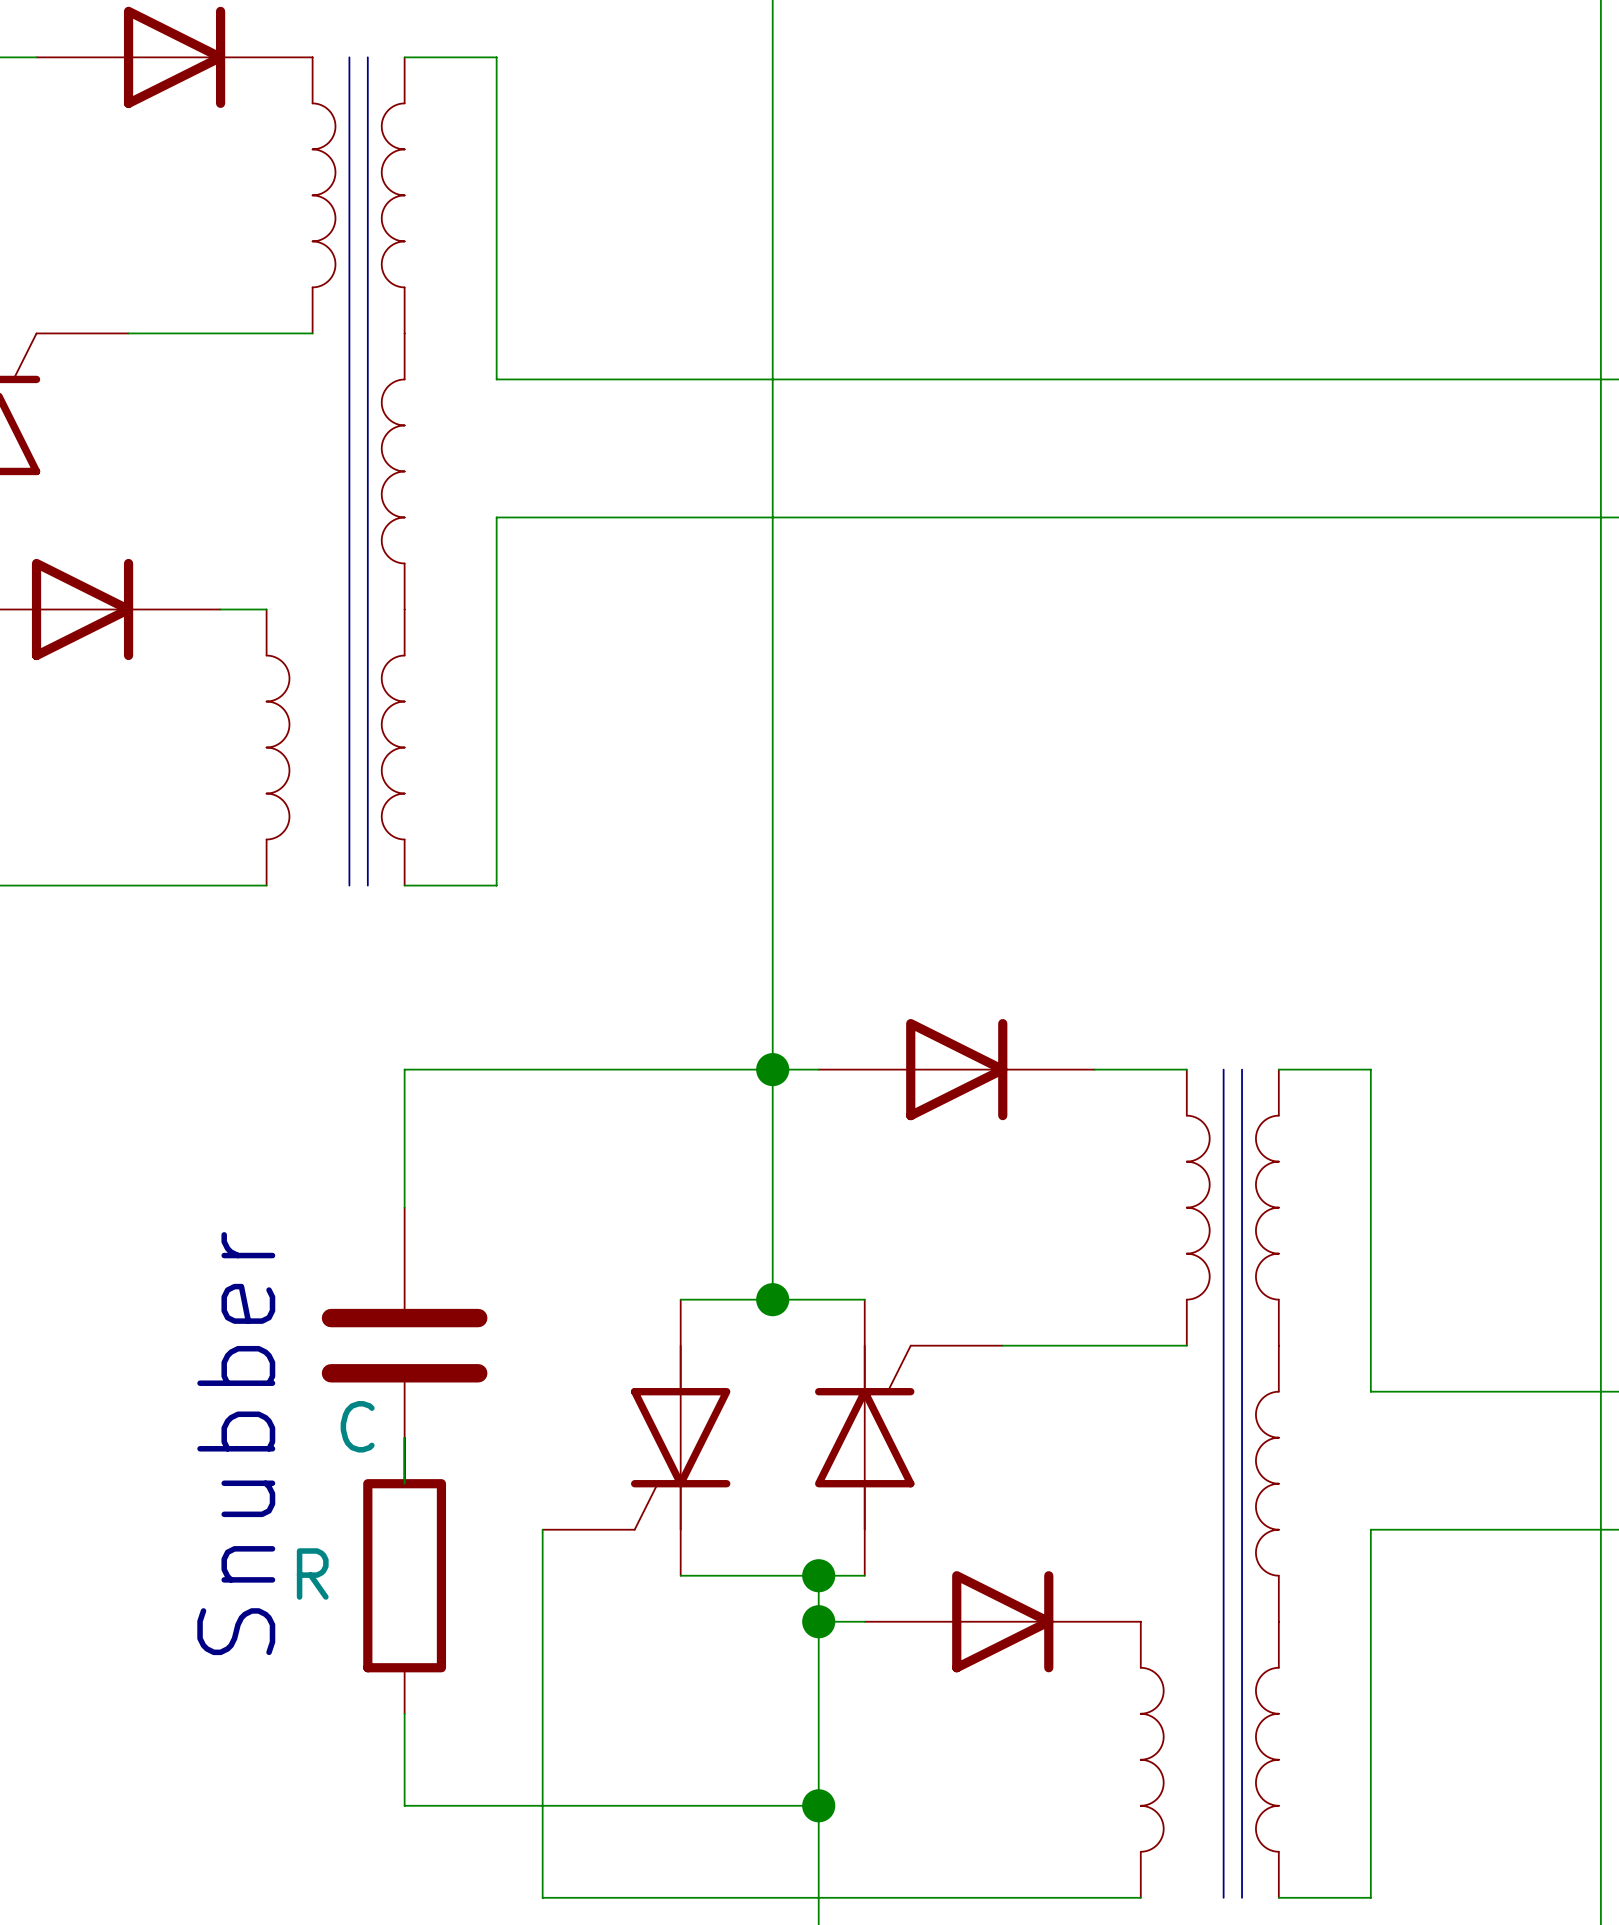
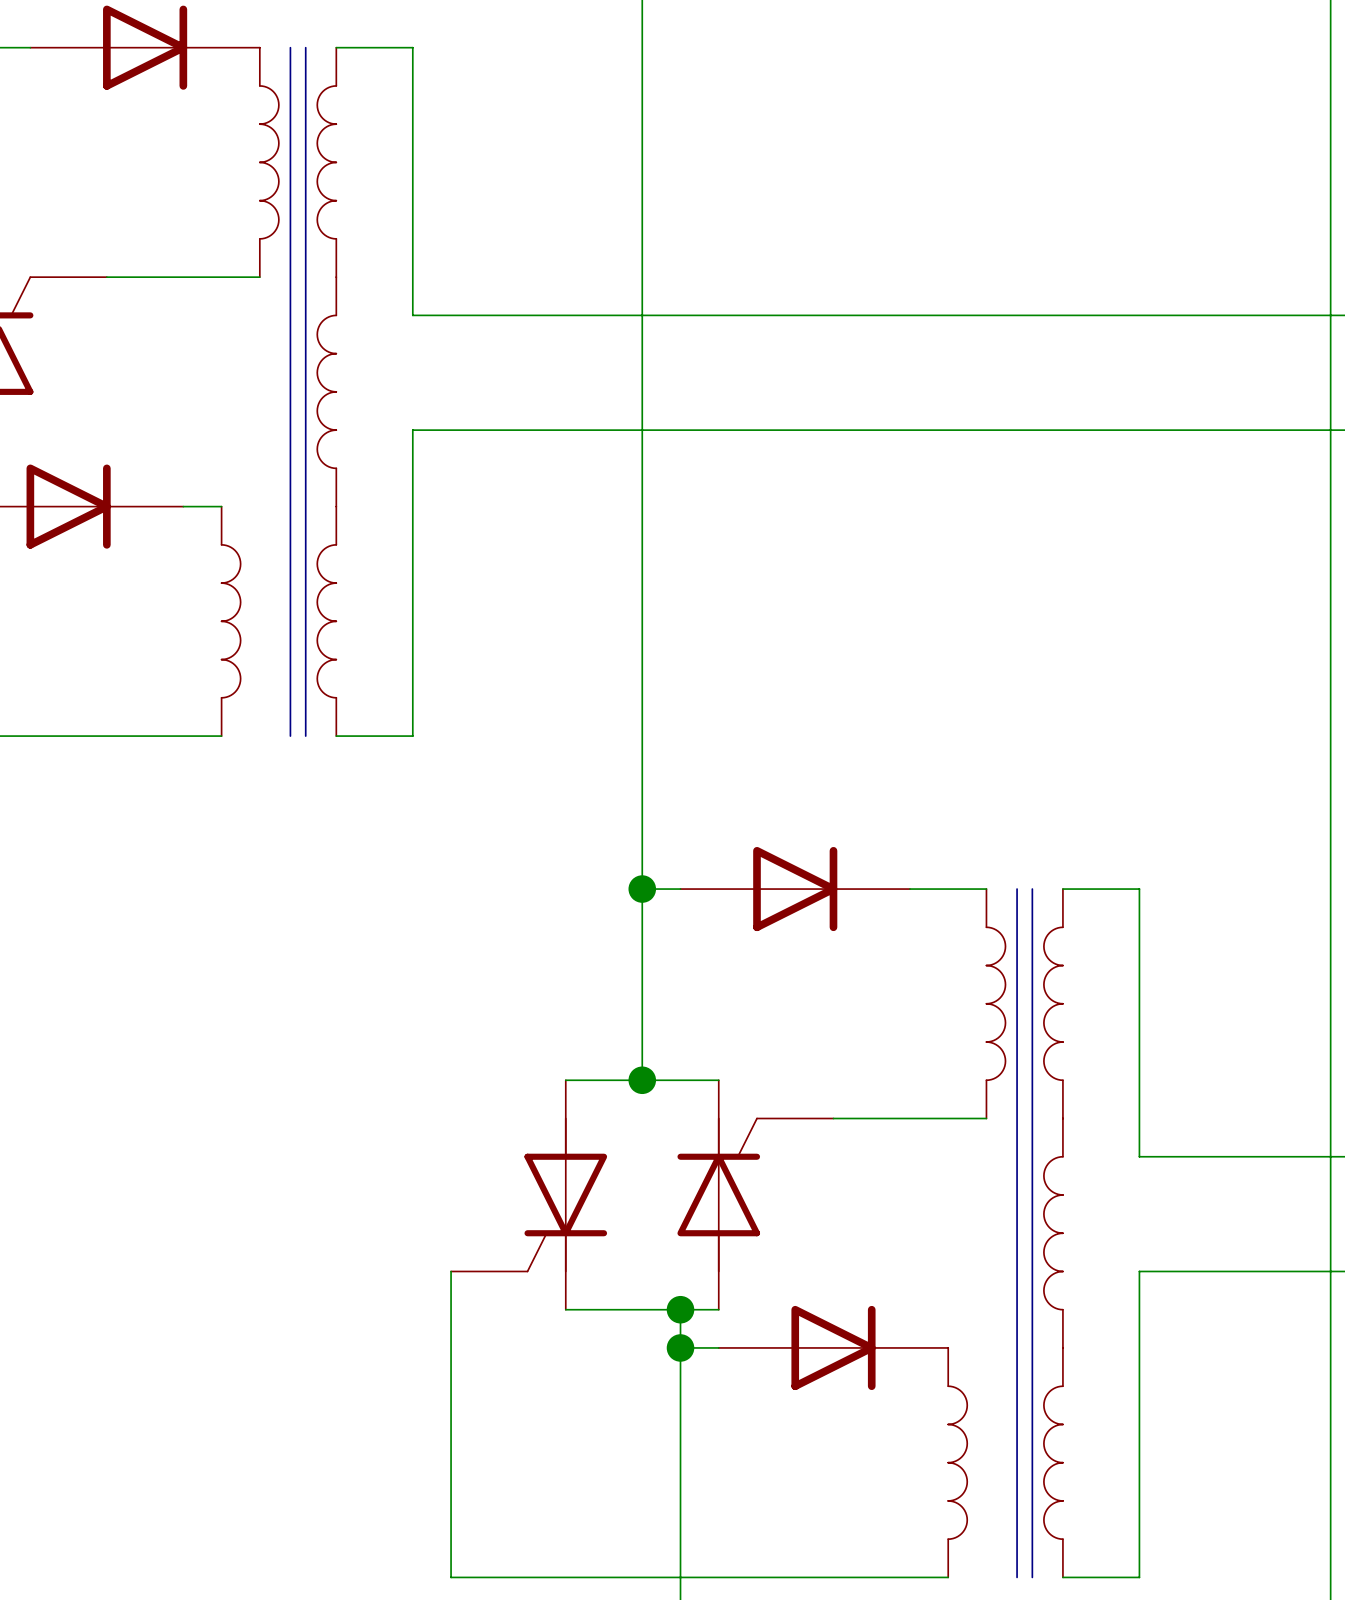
wire: (772, 1069) (404, 1069) (404, 1207) -> none
part: C (404, 1345) -> none
wire: (404, 1437) (404, 1483) -> none
text: Snubber (236, 1443) -> none
part: R (404, 1575) -> none
wire: (404, 1713) (404, 1805) (818, 1805) -> none
junction: (818, 1805) -> none

